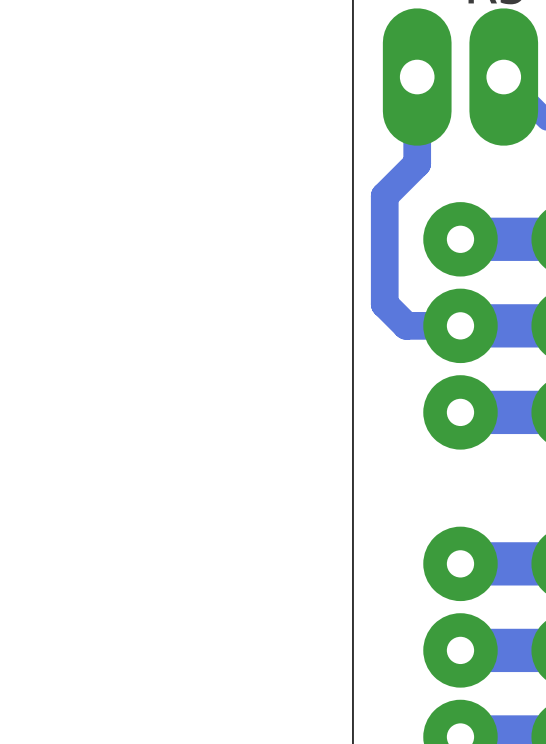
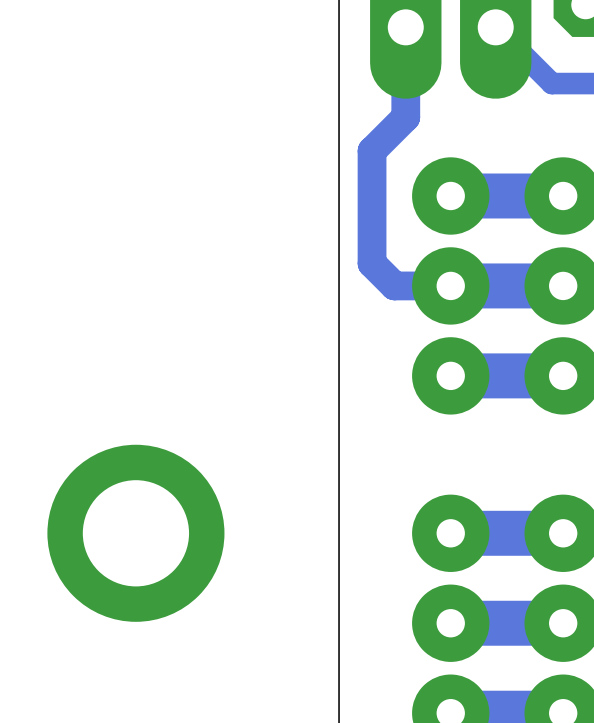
via: none -> (135, 533)

